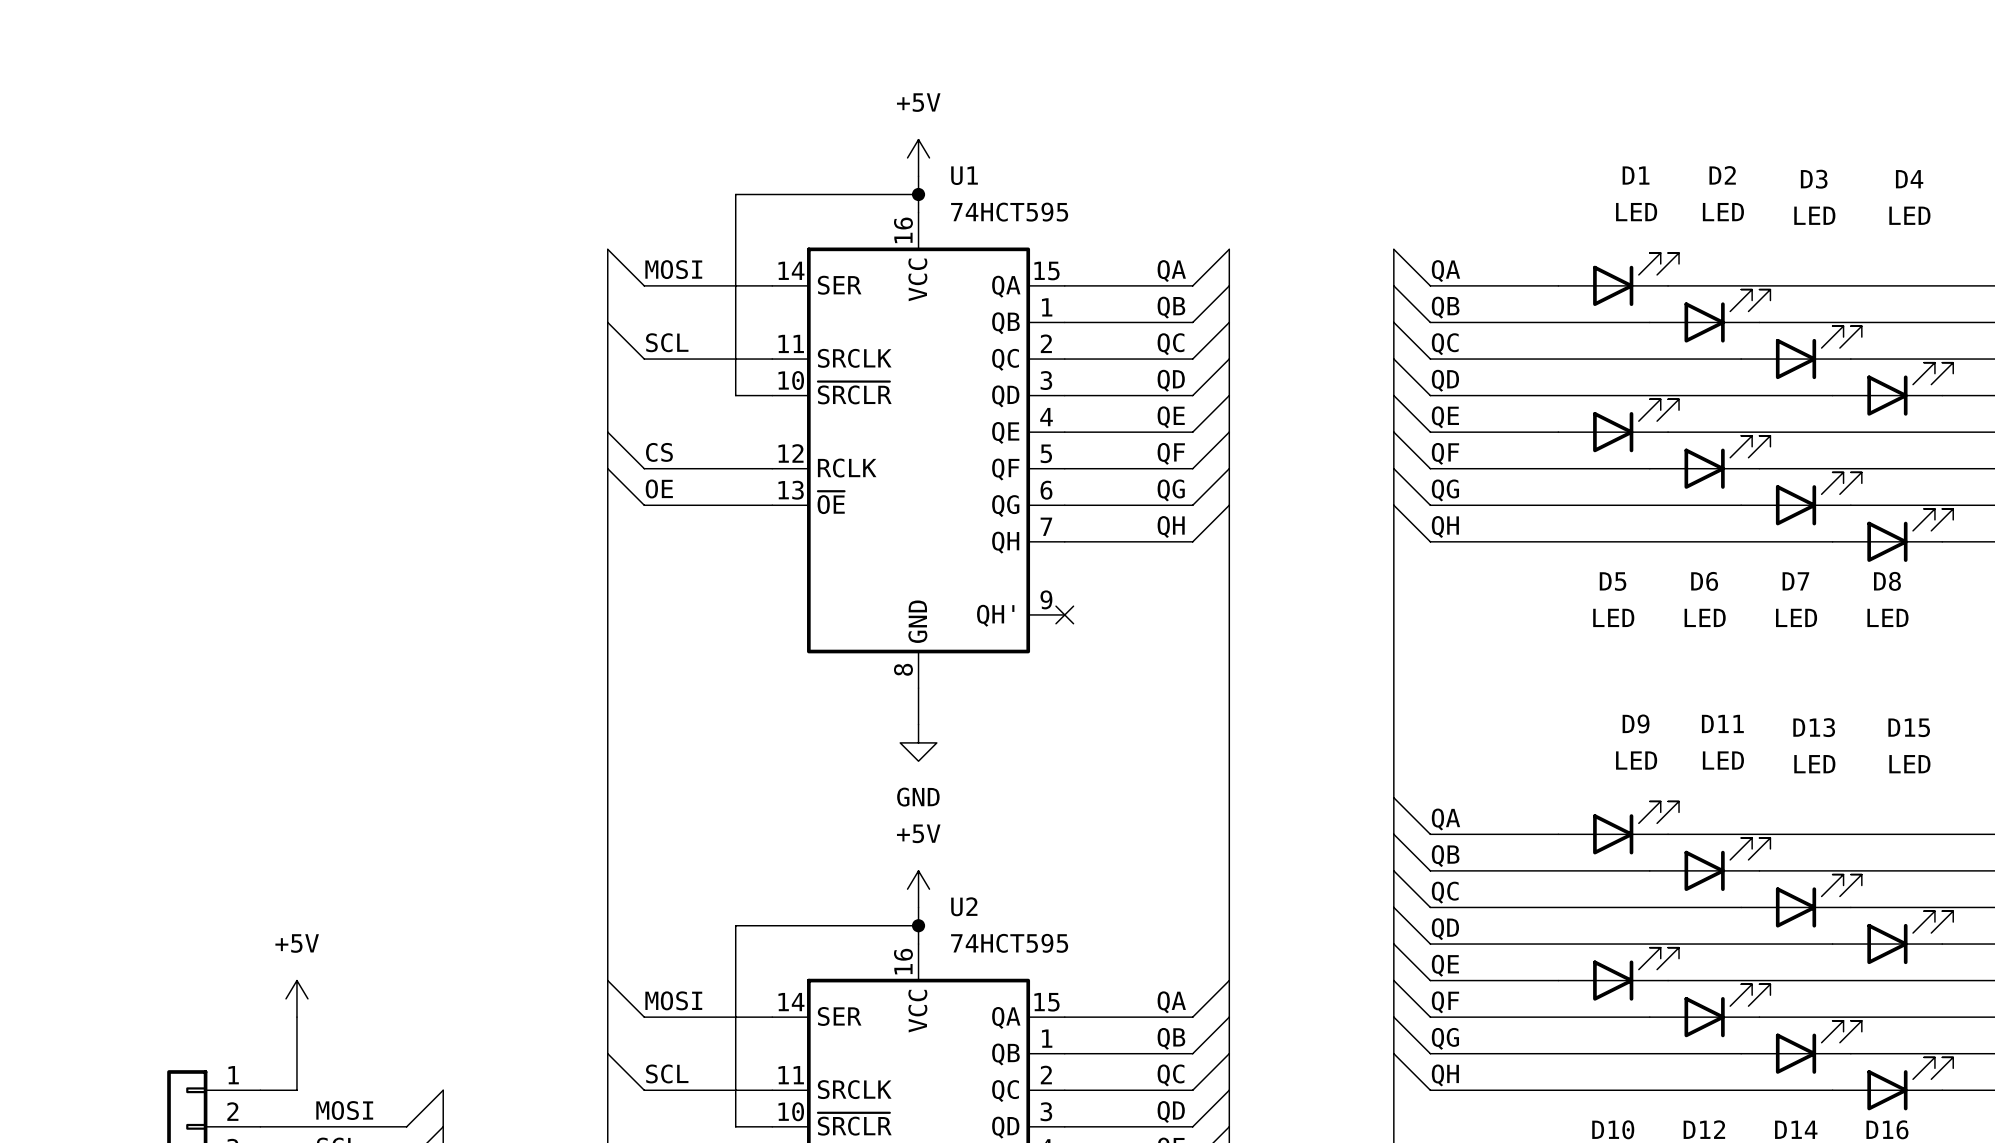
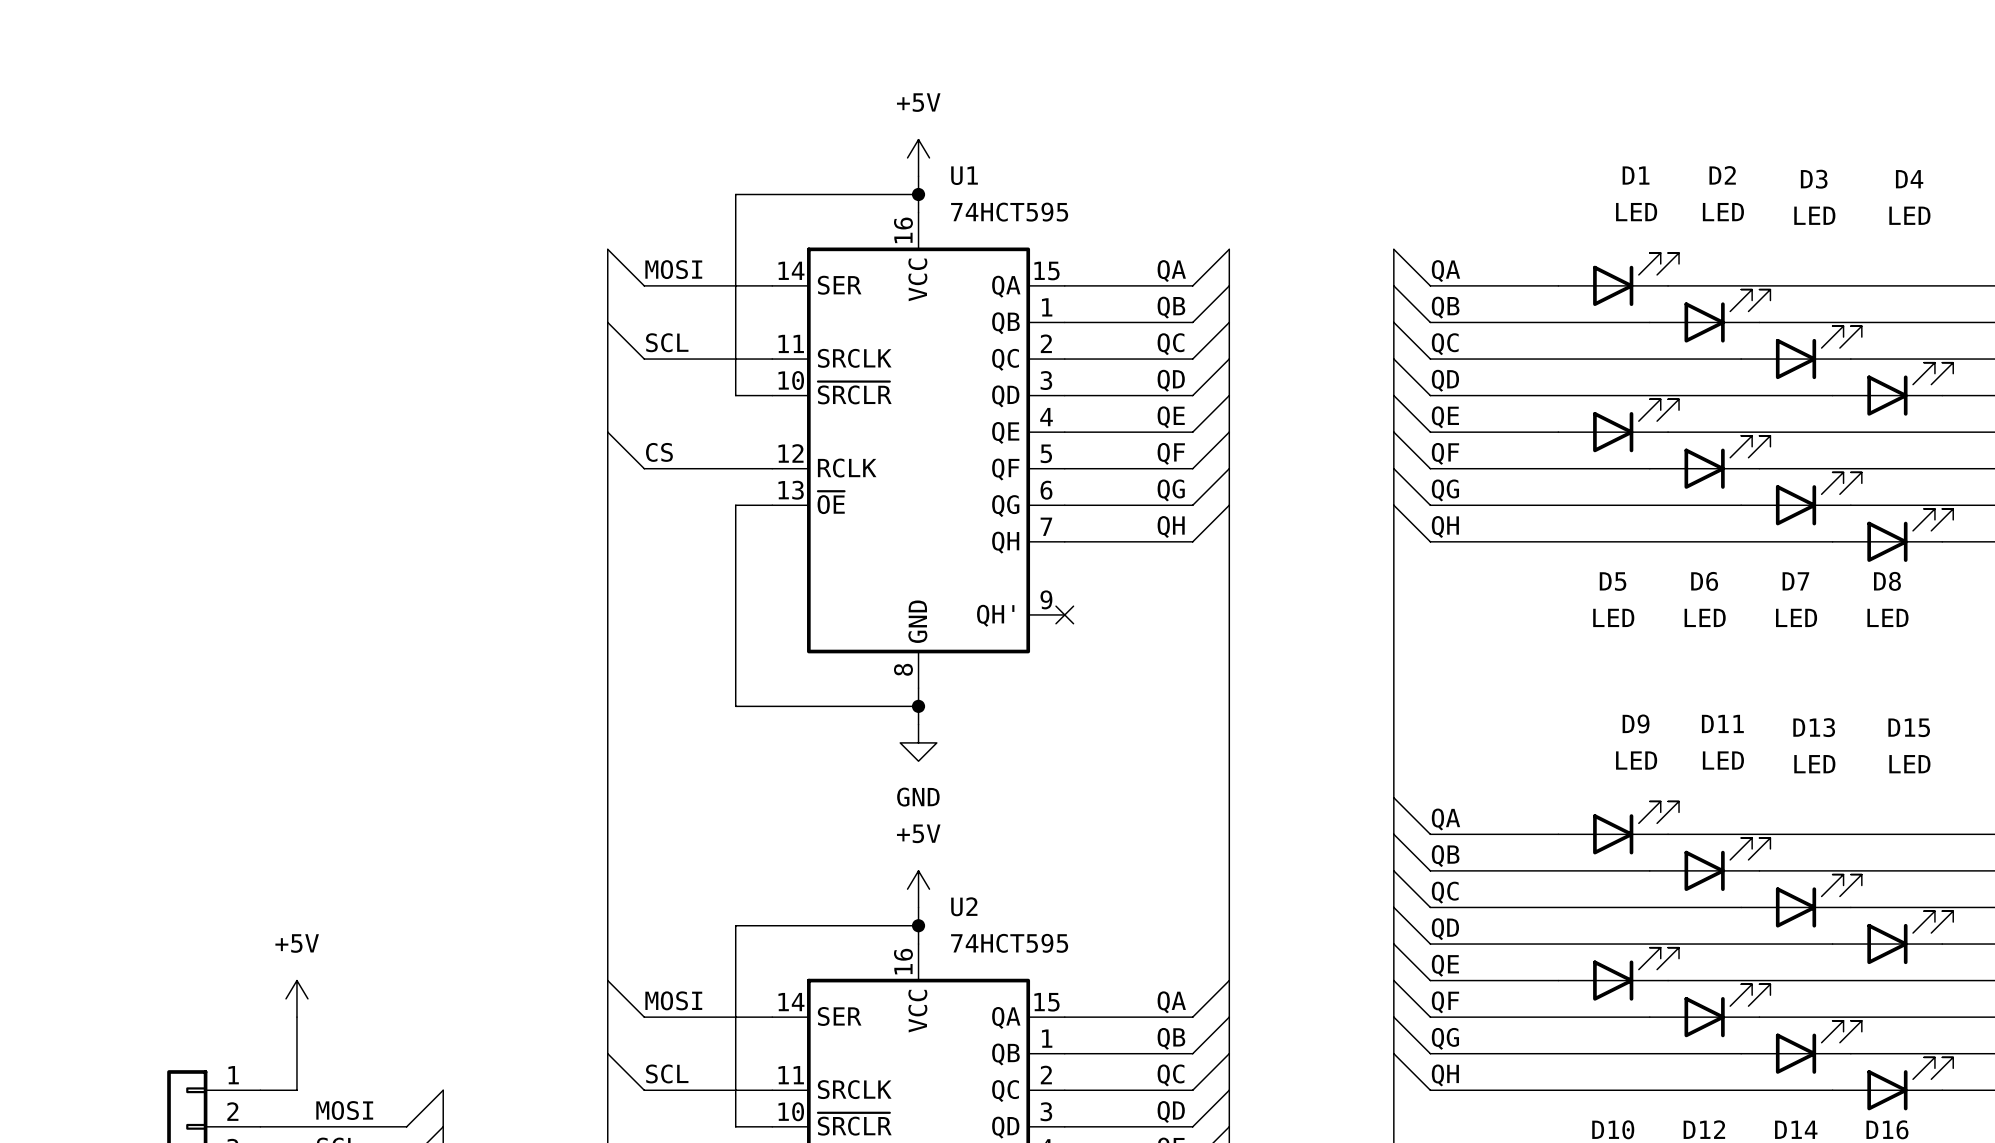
wire: (607, 468) (644, 505) (735, 505) -> (918, 706) (735, 706) (735, 505)
label: OE (659, 488) -> none
junction: none -> (918, 706)

